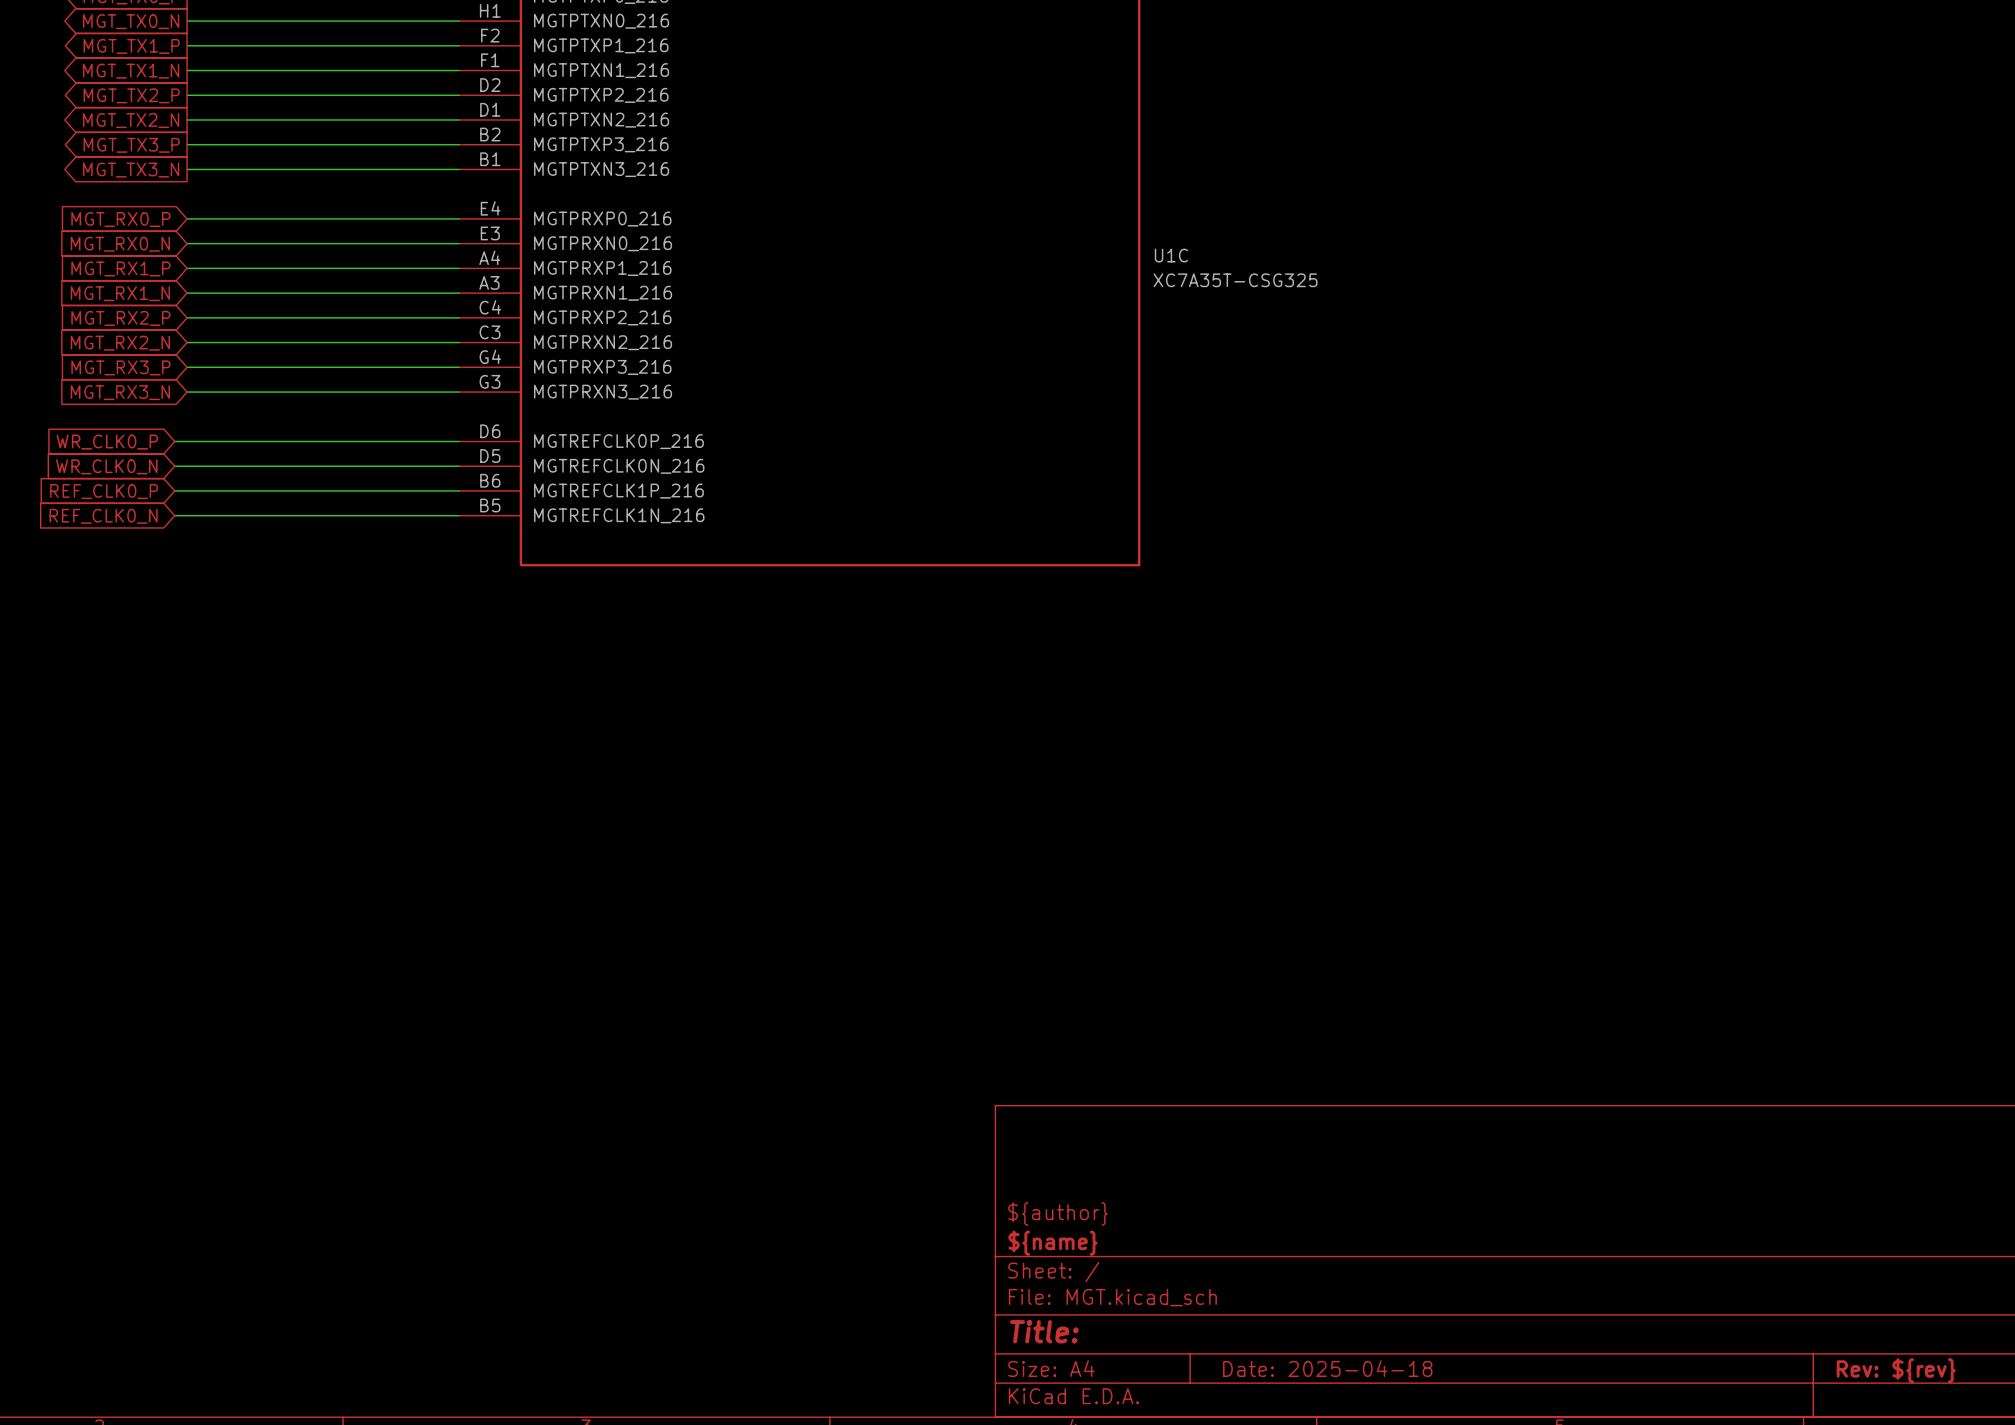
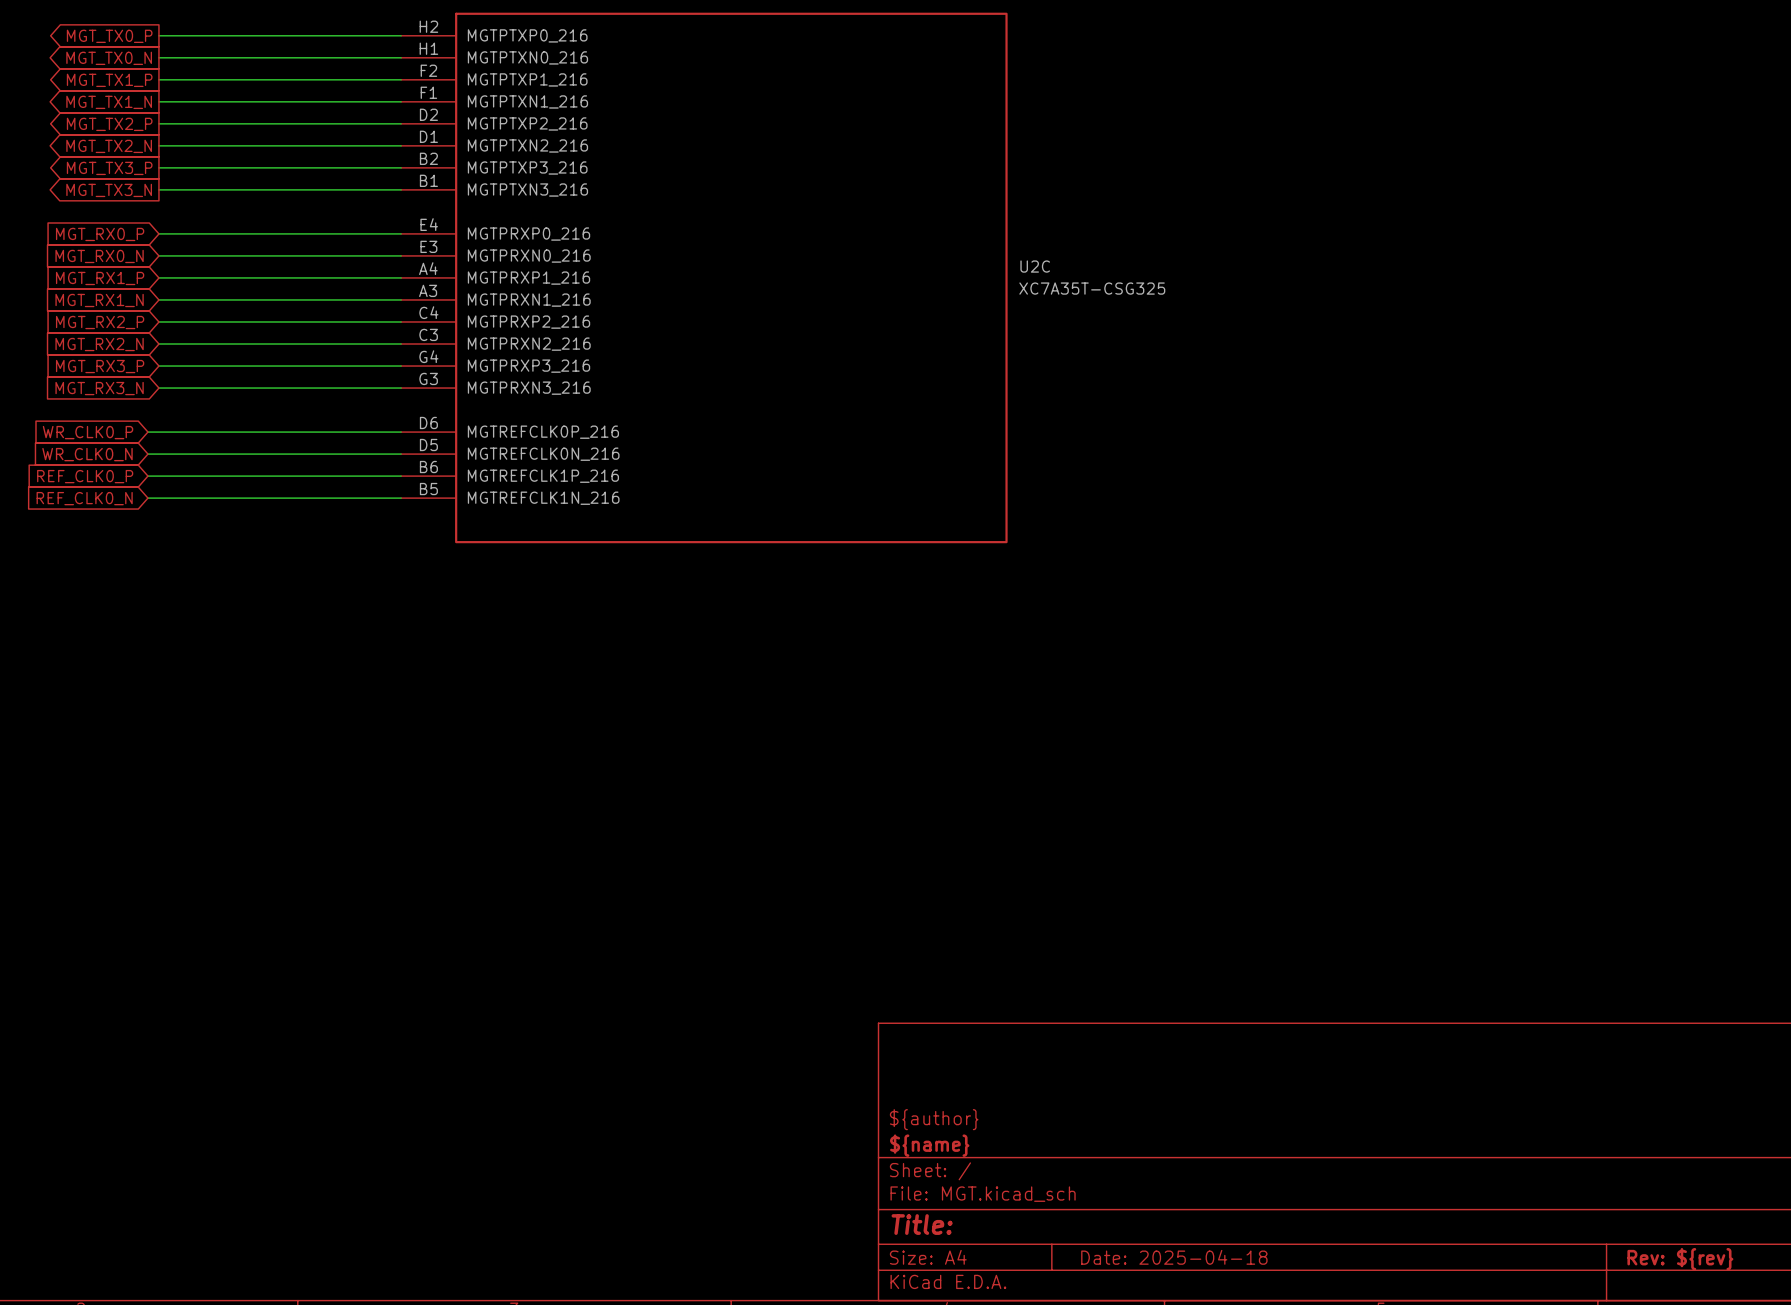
U1C name: U1C (1171, 255) -> U2C (1035, 266)

